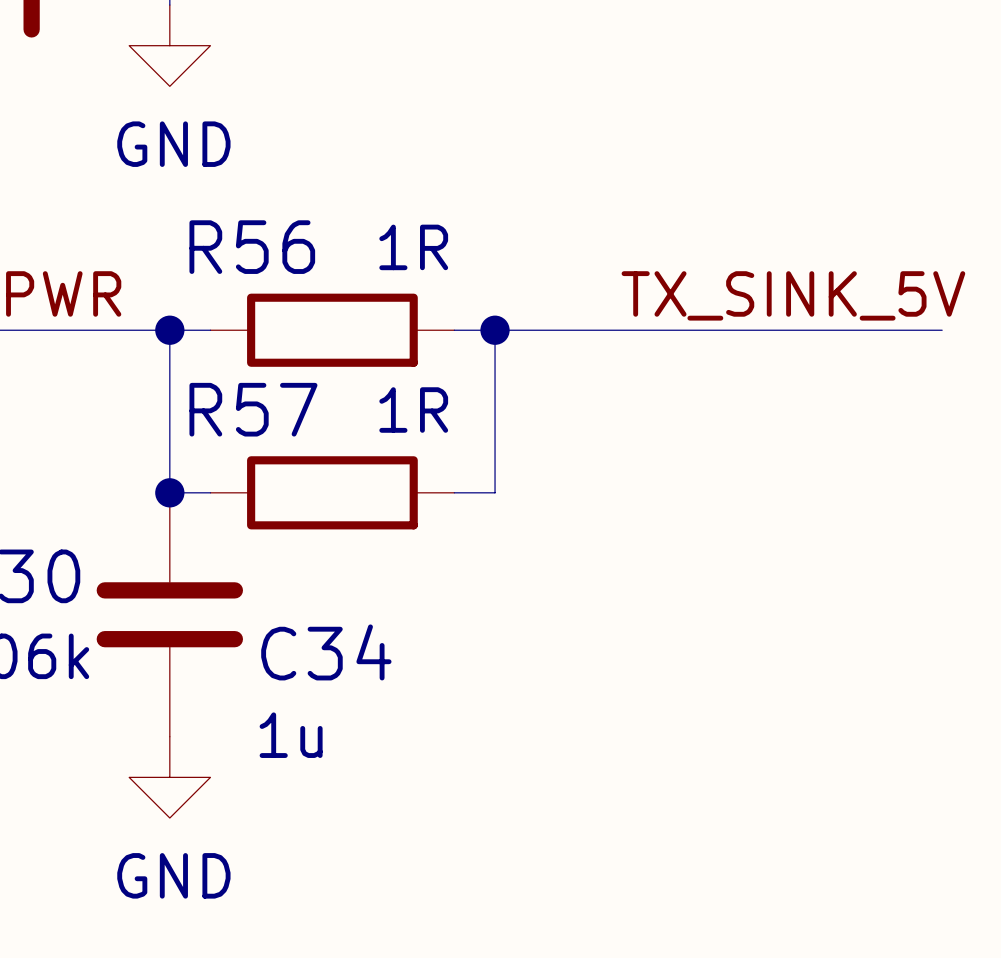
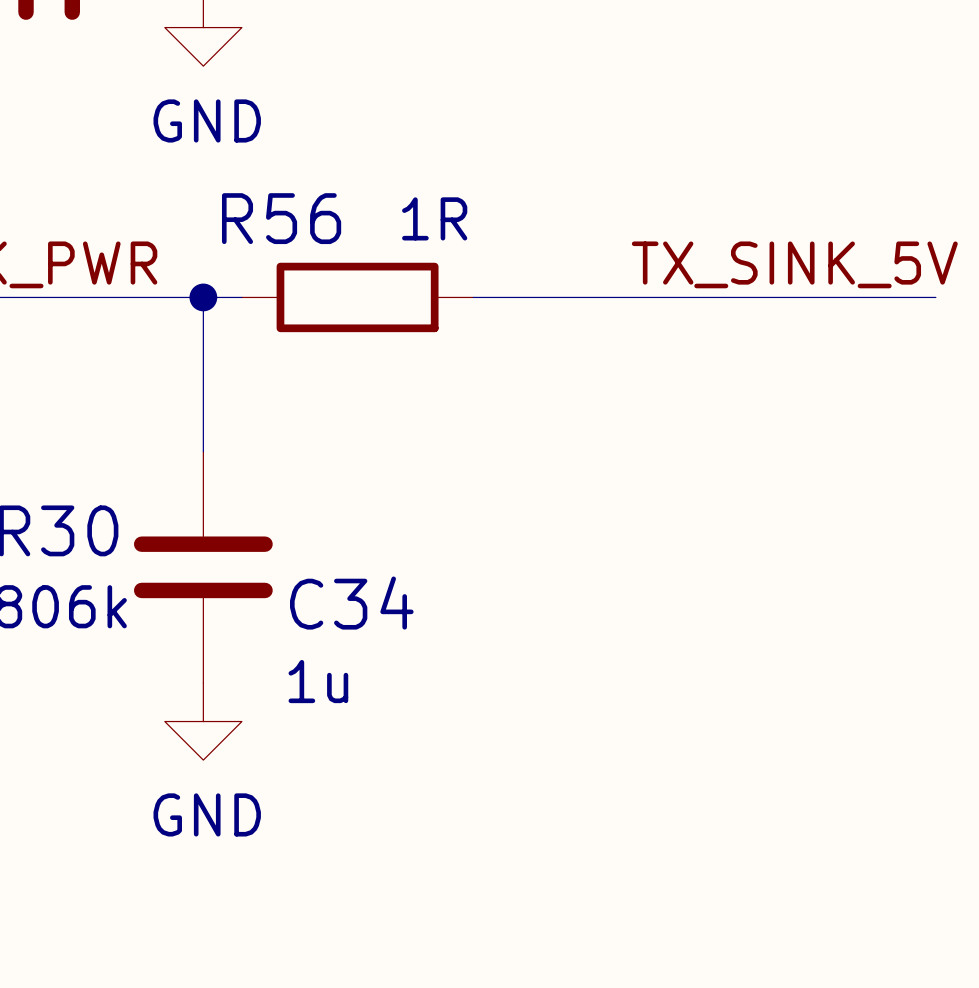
wire: (495, 330) (495, 492) (454, 492) -> none
junction: (495, 330) -> none
wire: (169, 492) (210, 492) -> none
junction: (169, 492) -> none
R57: (332, 492) -> none

